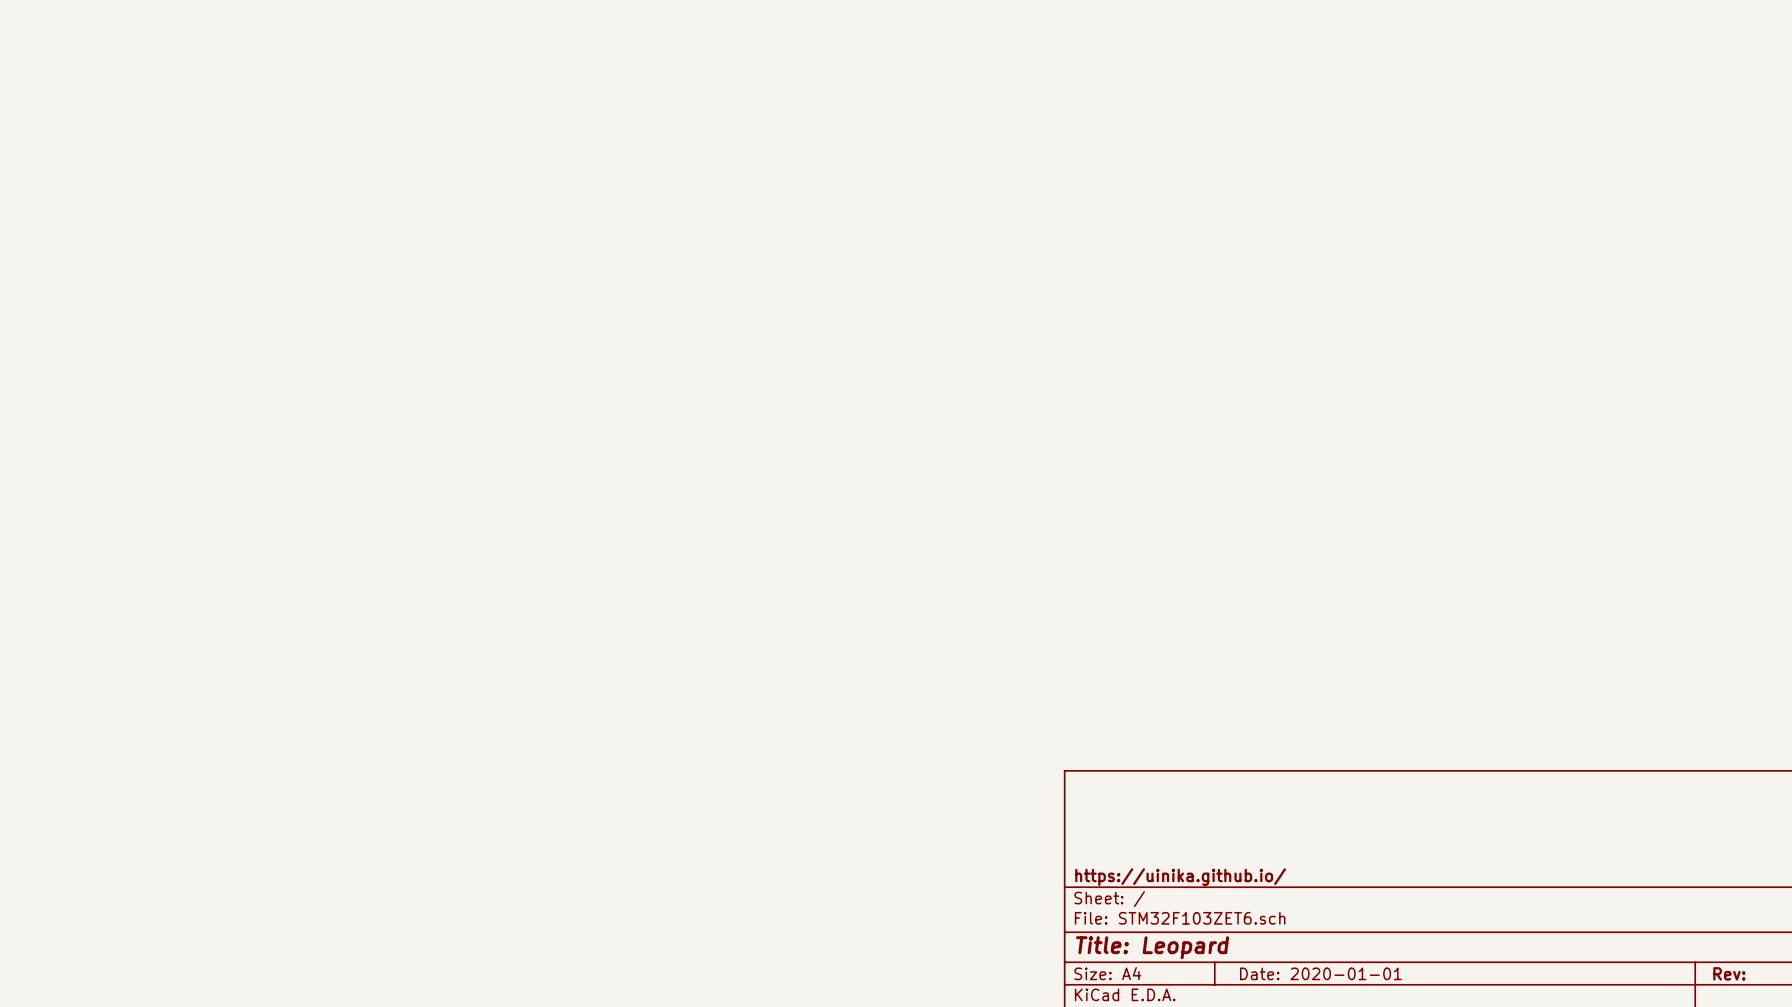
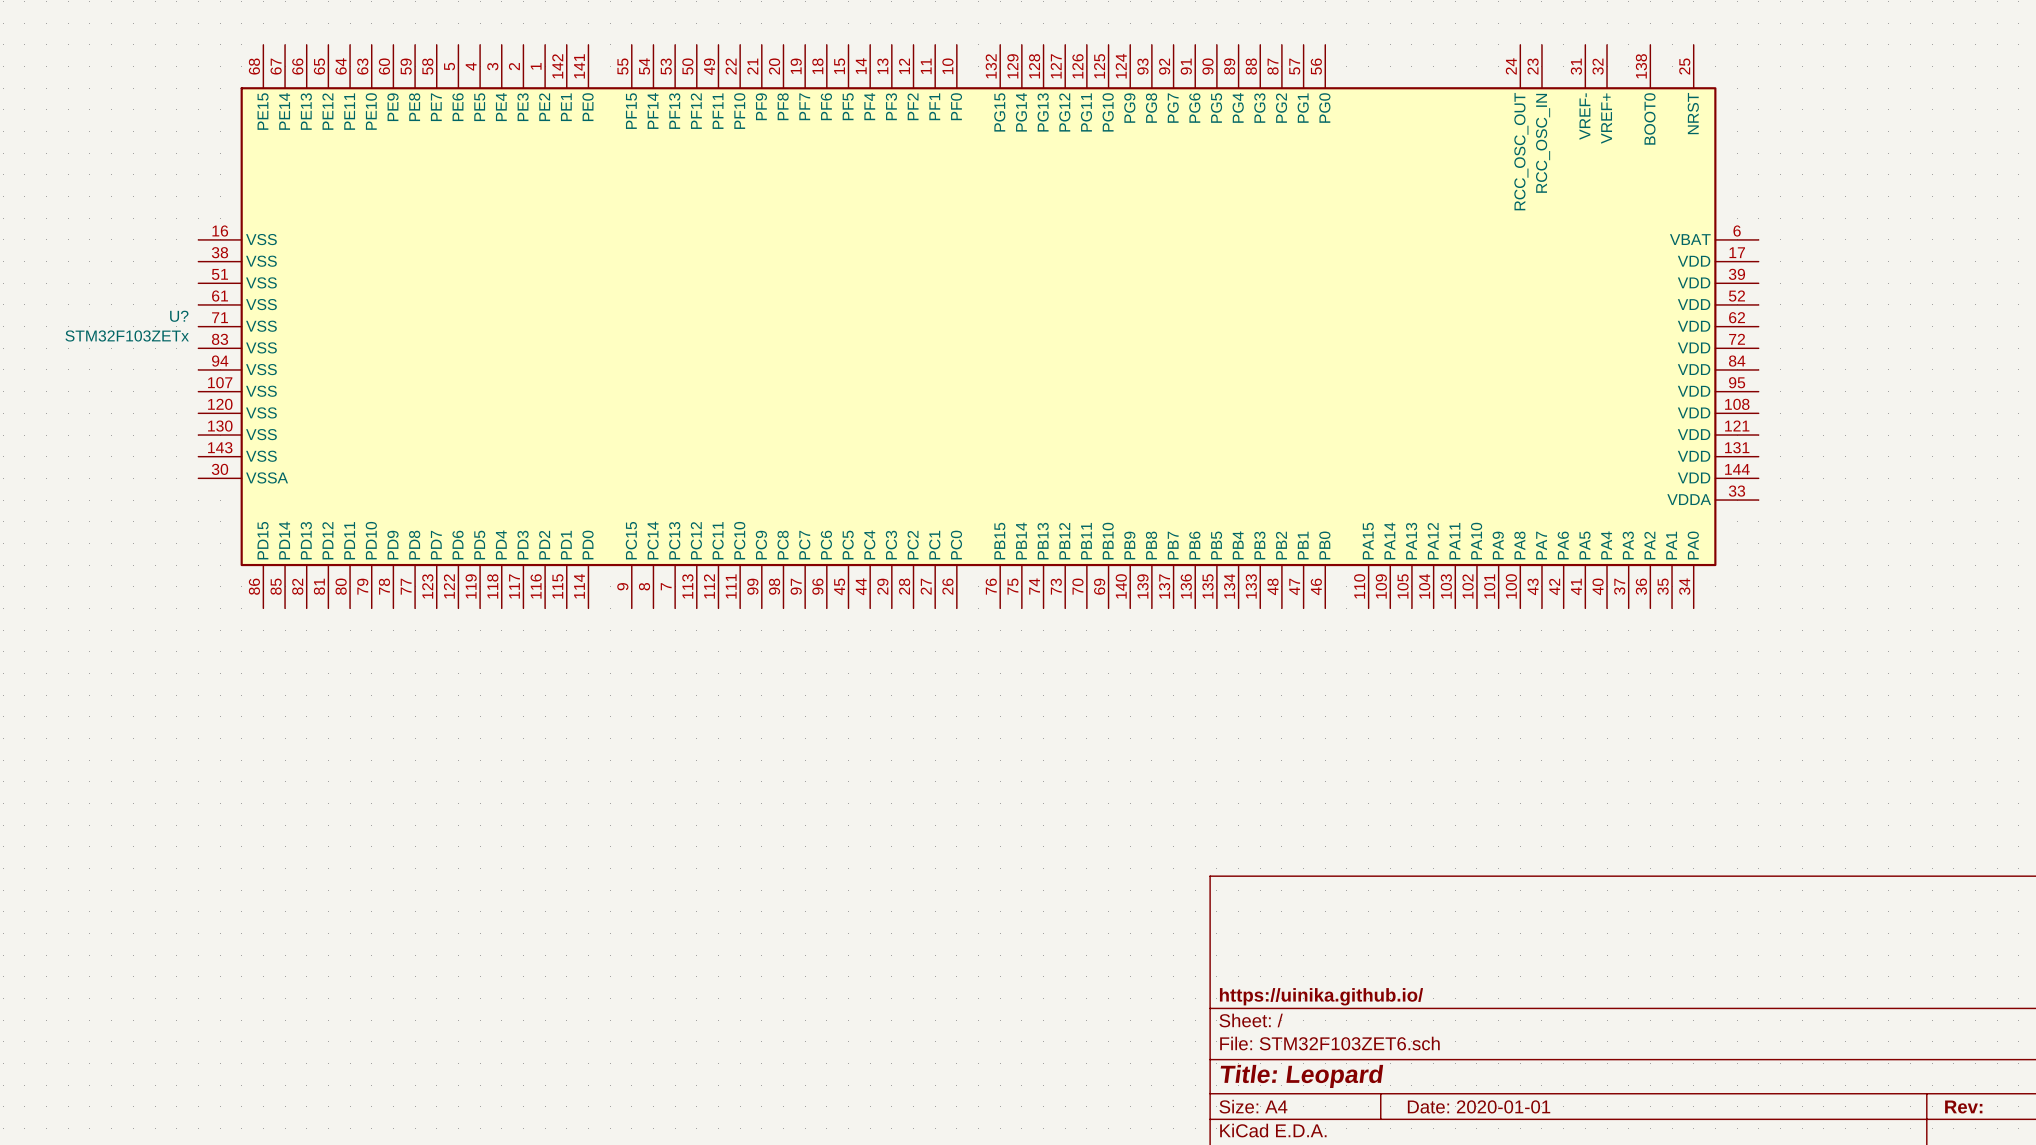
U?: none -> STM32F103ZETx (978, 326)

